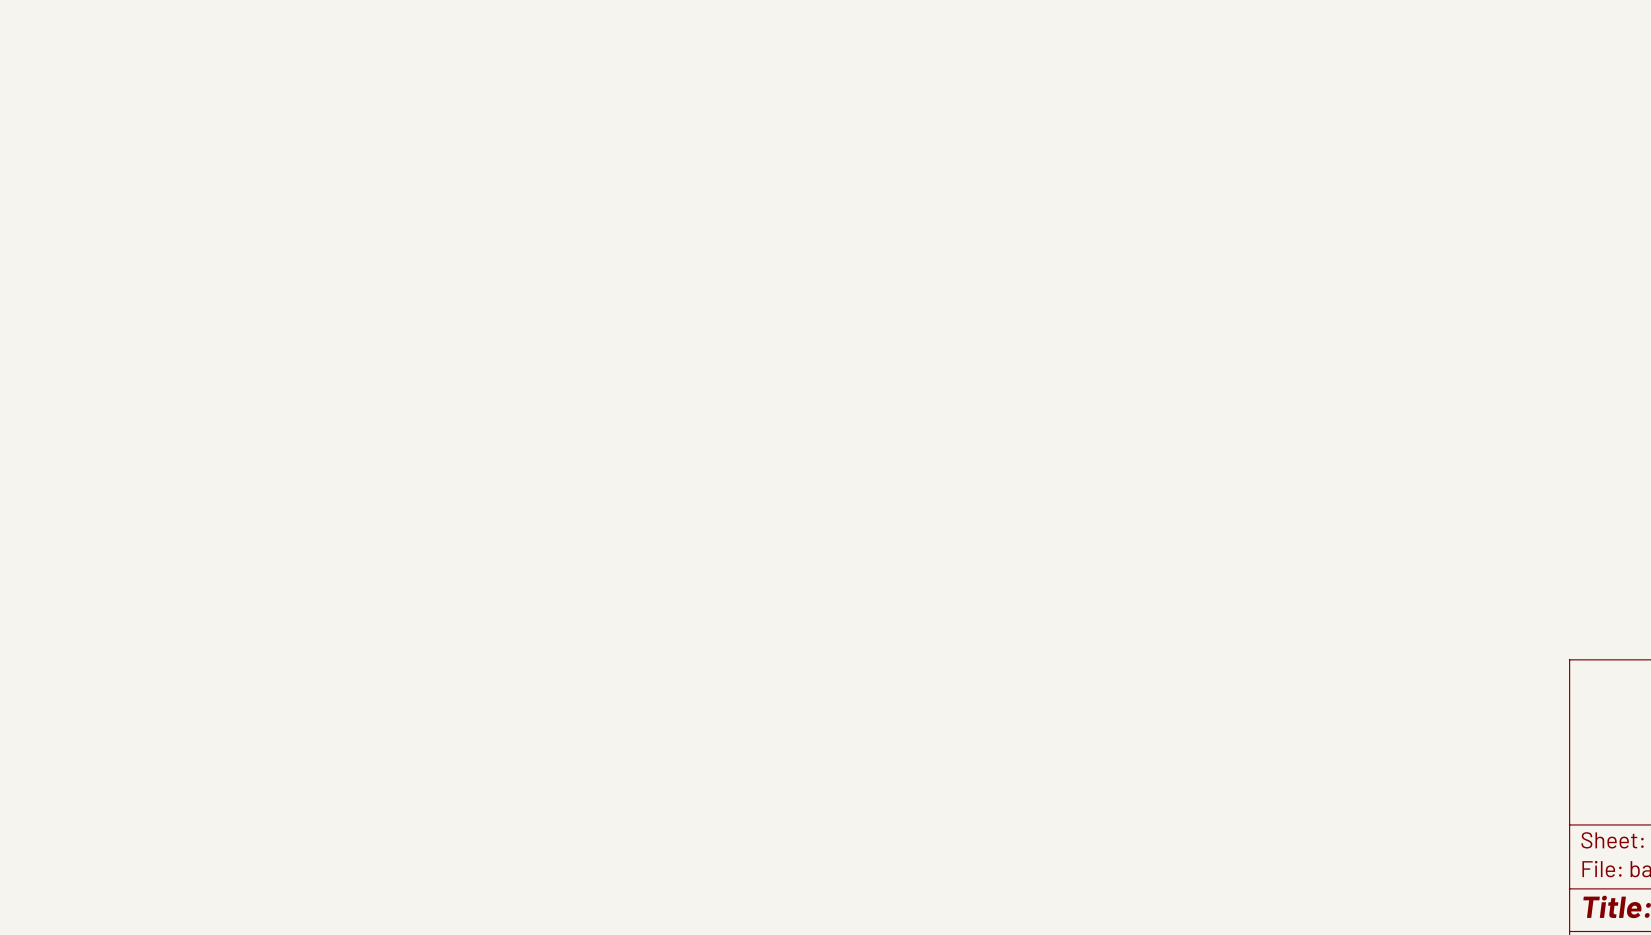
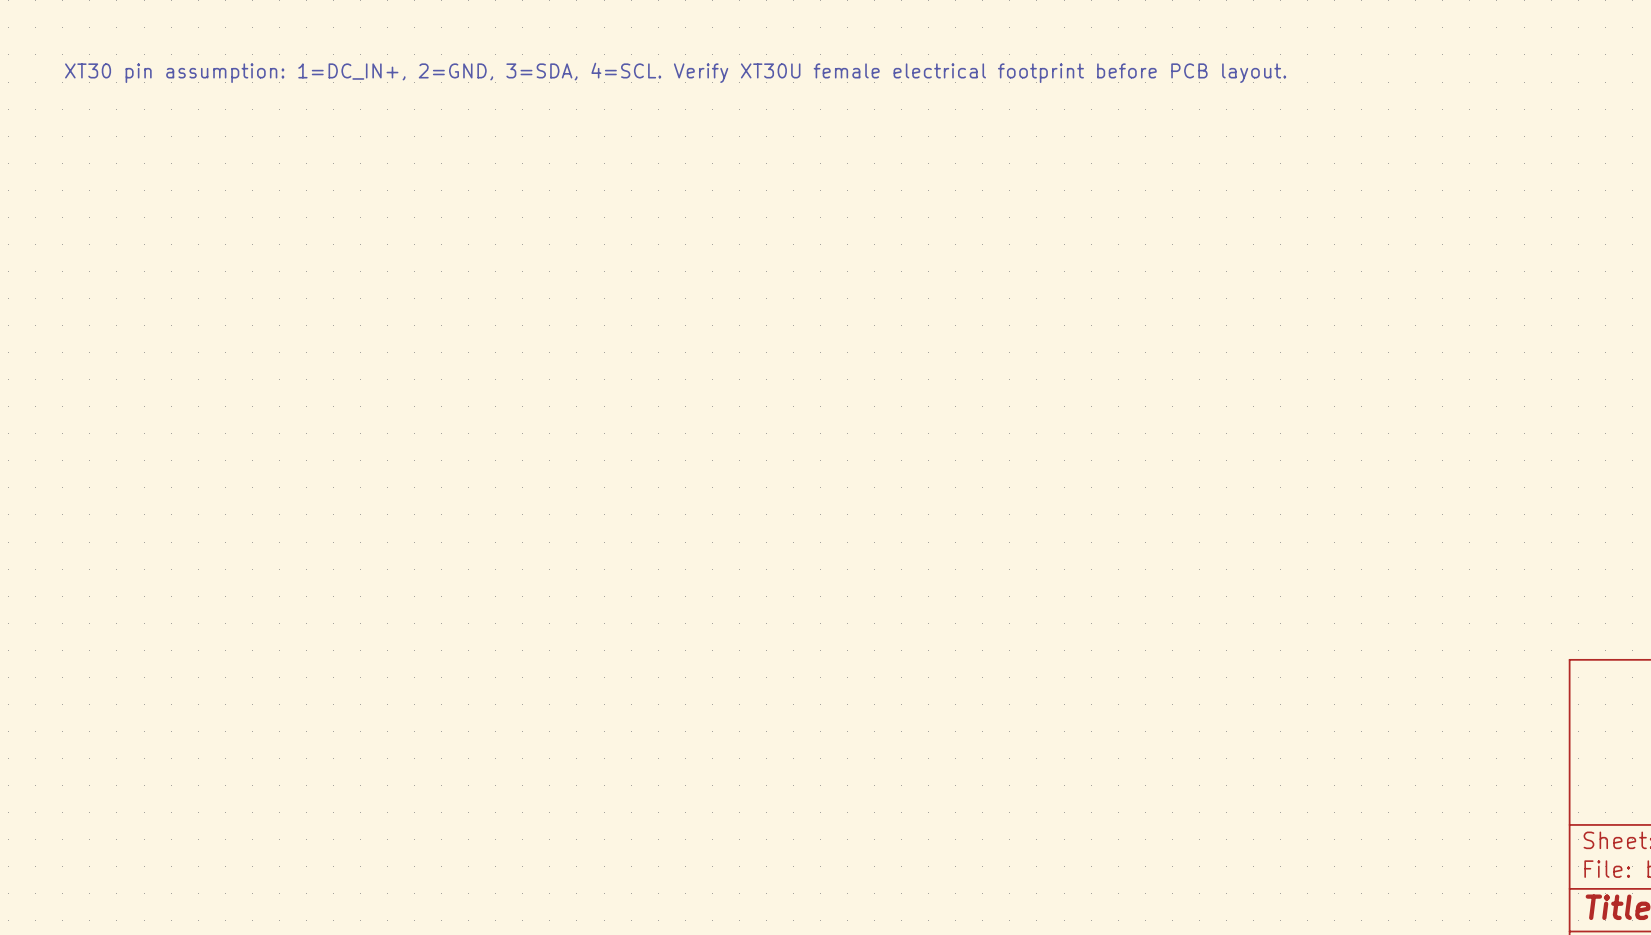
text: none -> XT30 pin assumption: 1=DC_IN+, 2=GND, 3=SDA, 4=SCL. Verify XT30U female electrical footprint before PCB layout. (675, 72)

